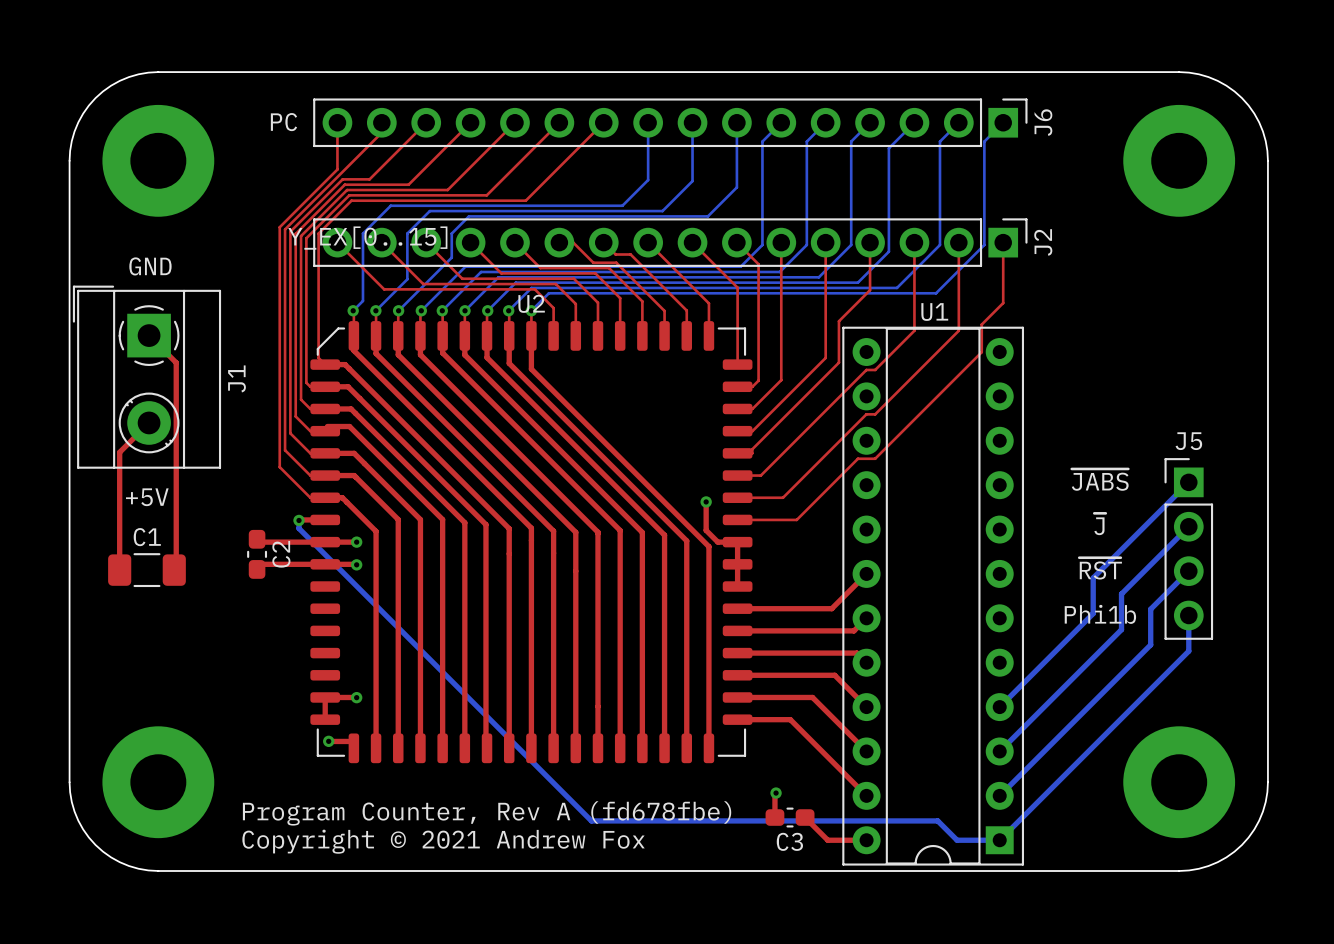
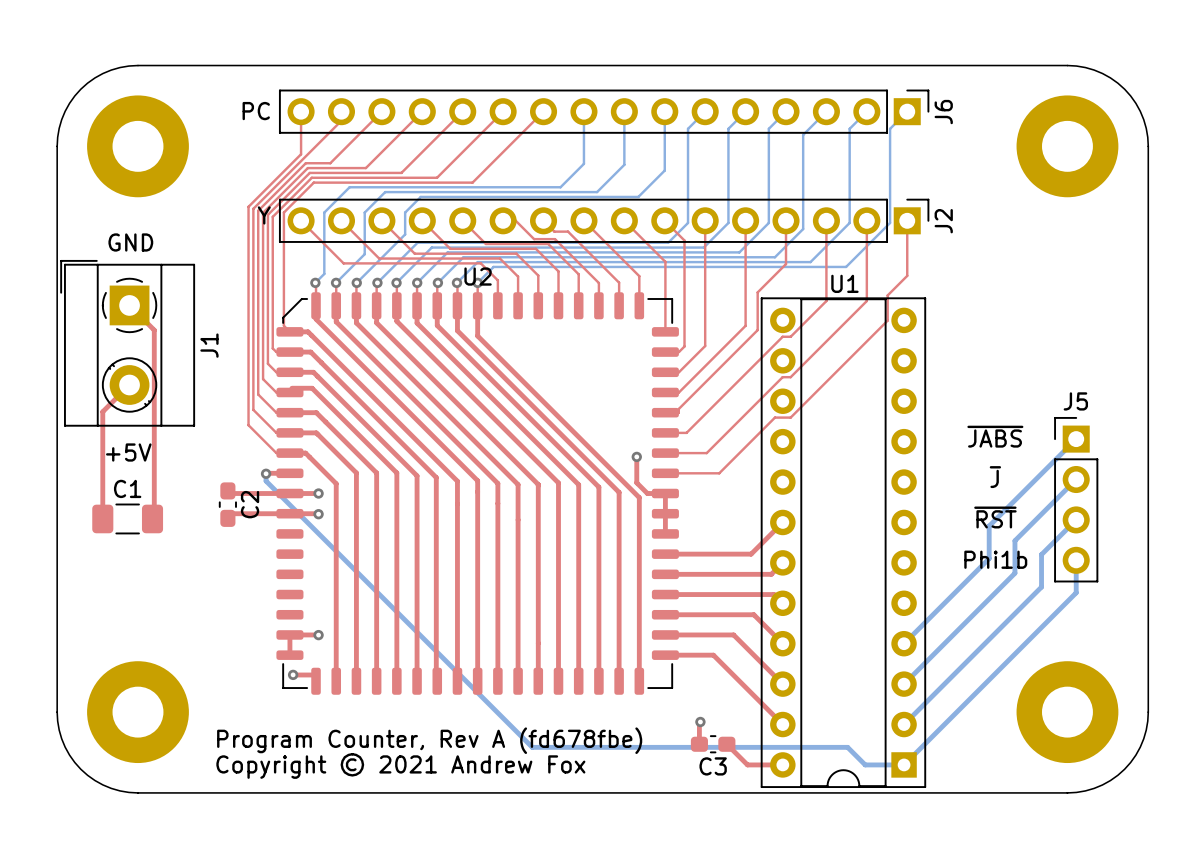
J2 value: Y_EX[0..15] (367, 238) -> Y (264, 215)

